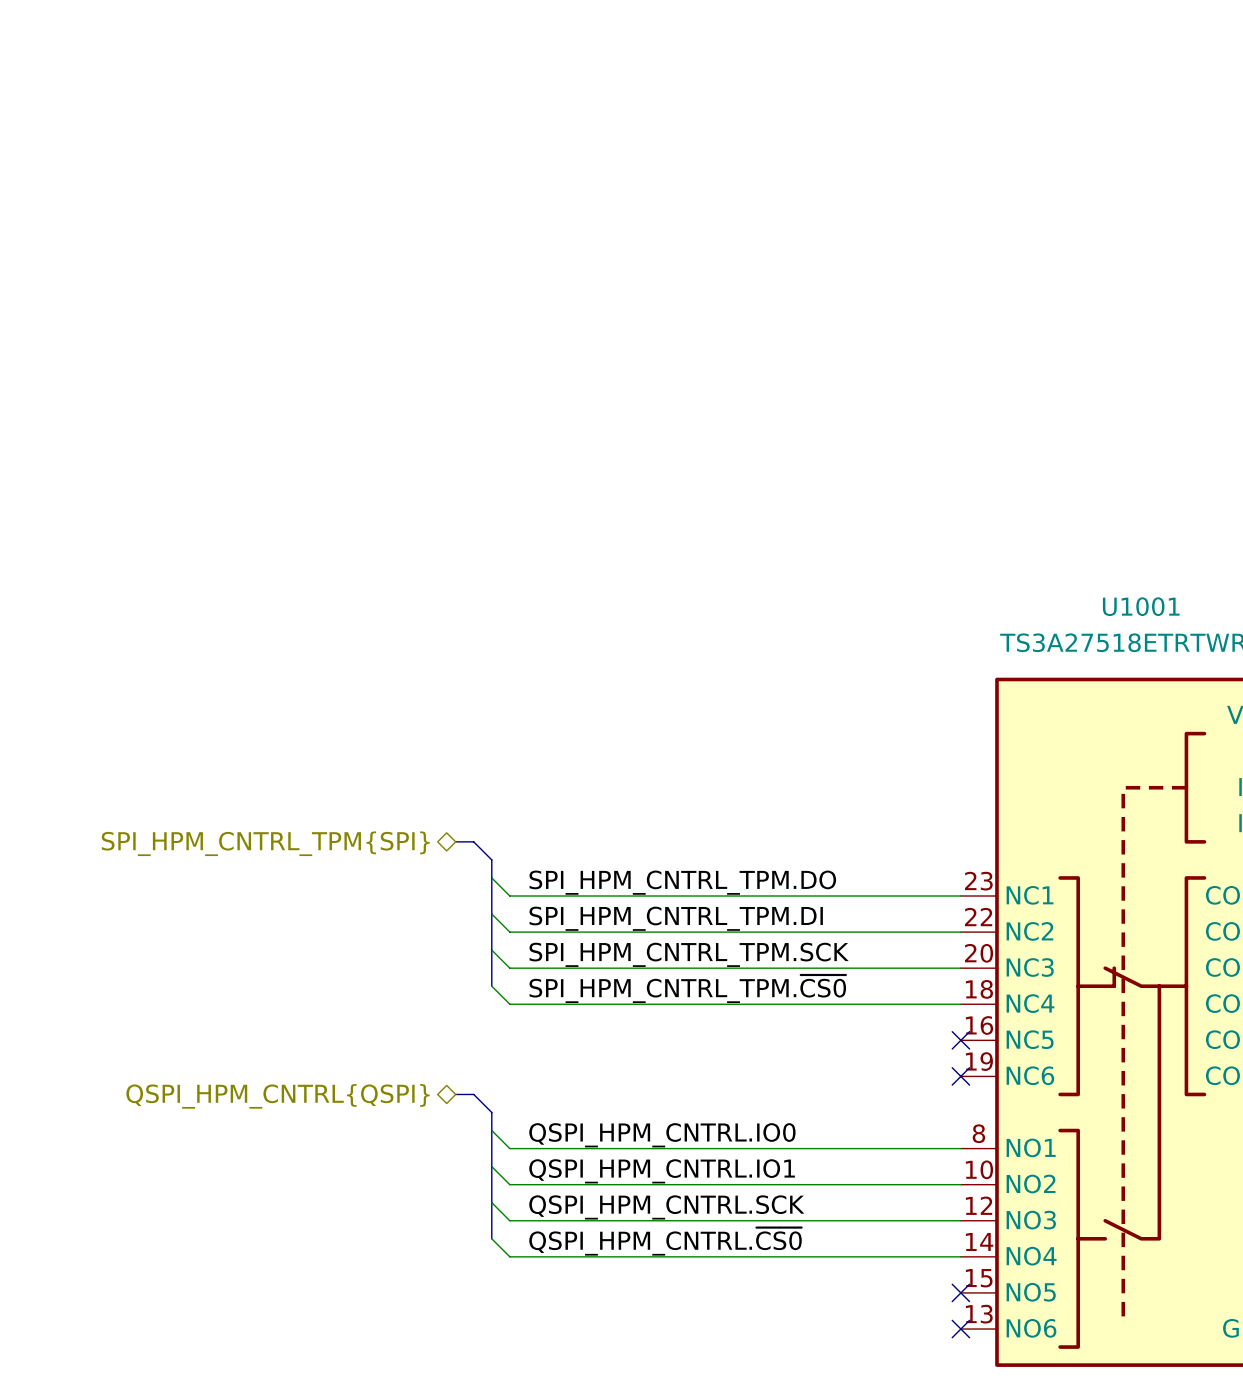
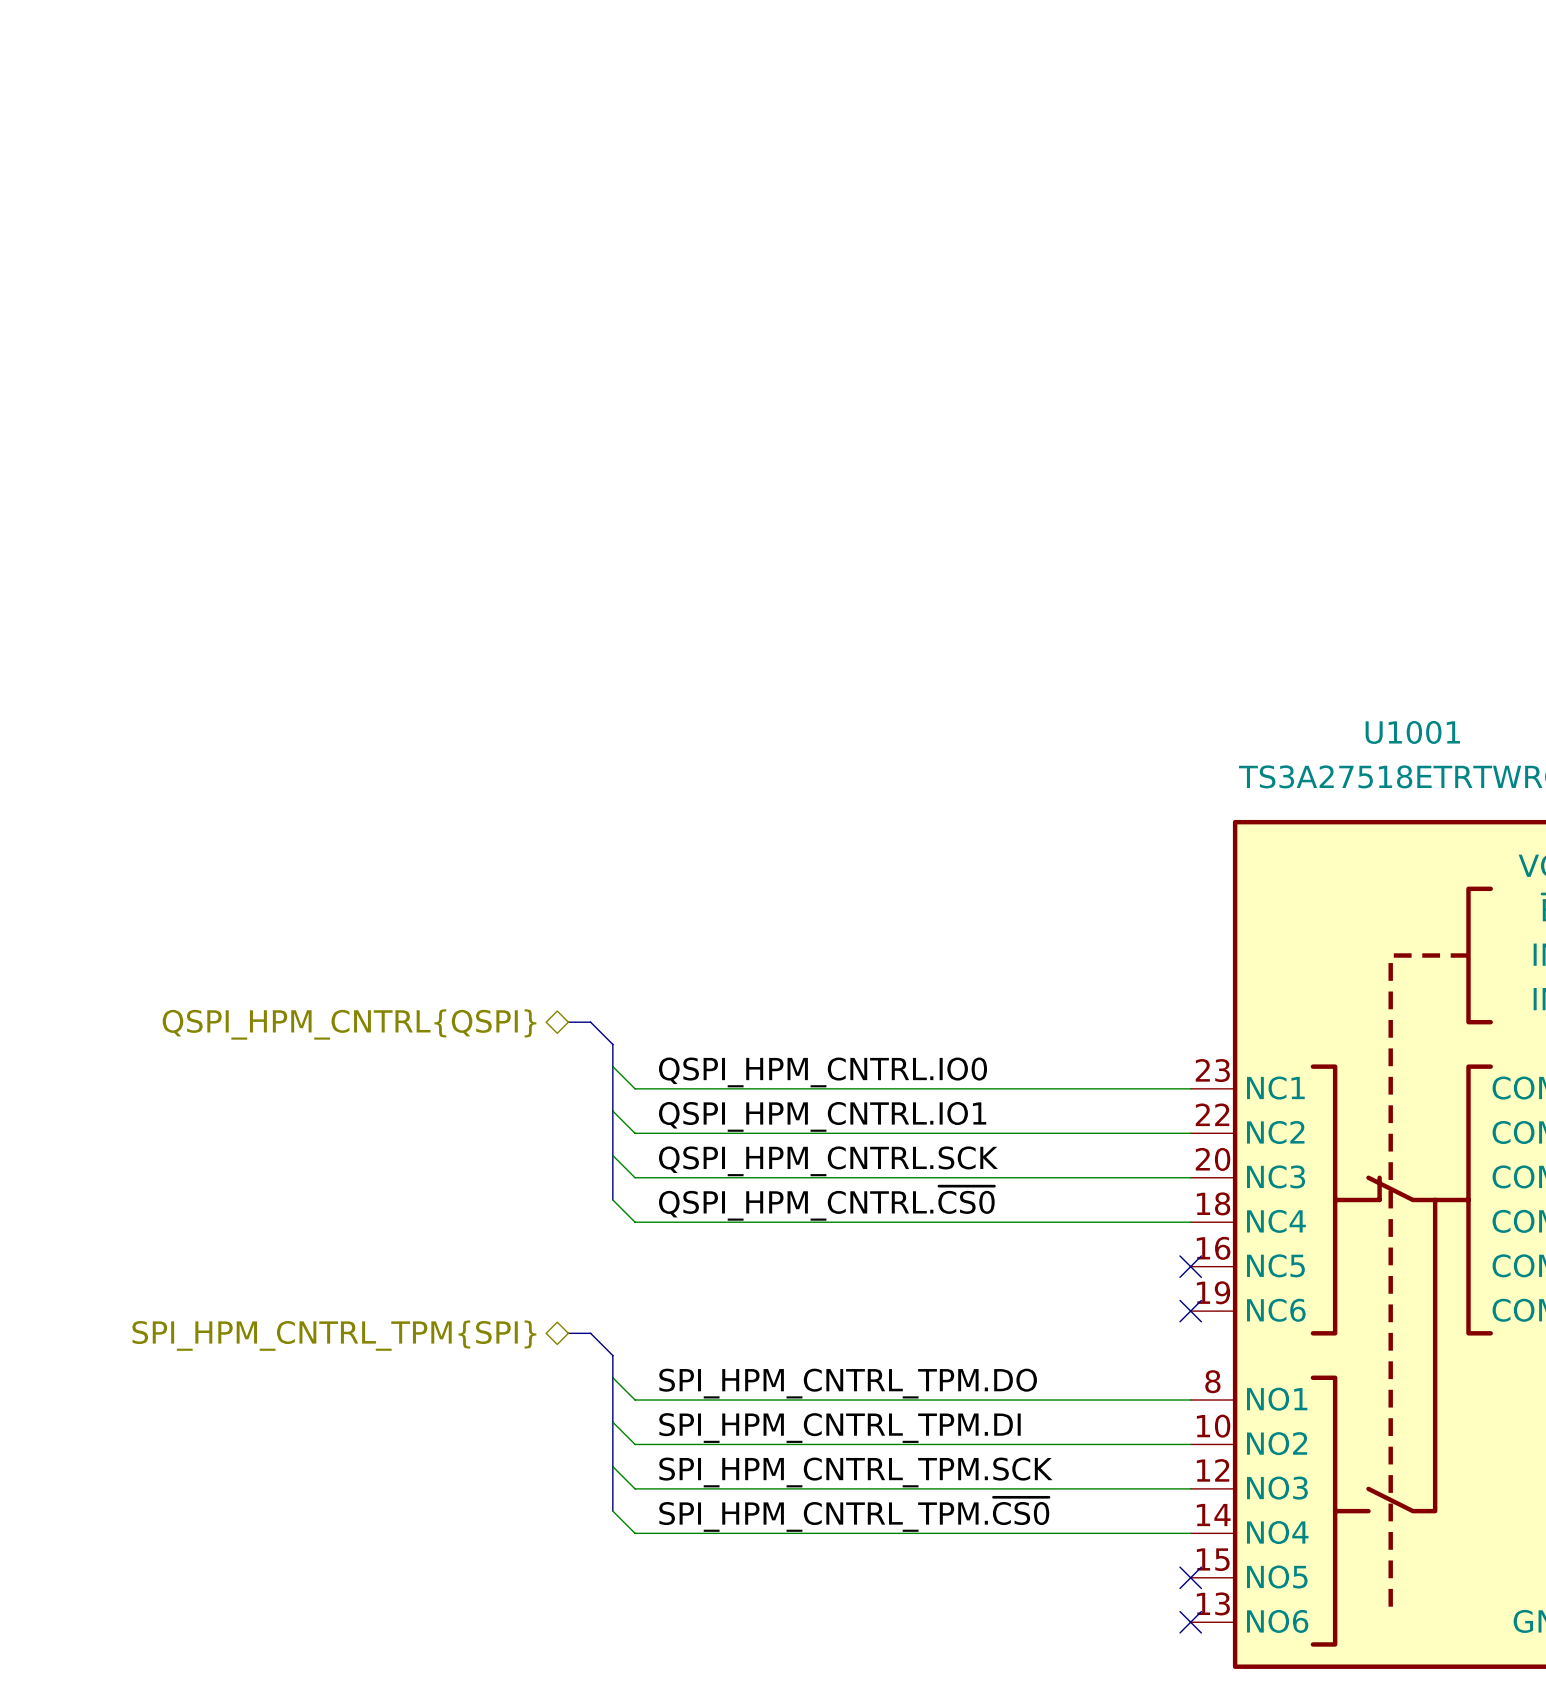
hierarchical label: SPI_HPM_CNTRL_TPM{SPI} (265, 843) -> QSPI_HPM_CNTRL{QSPI} (349, 1024)
label: SPI_HPM_CNTRL_TPM.DO (682, 882) -> QSPI_HPM_CNTRL.IO0 (823, 1072)
label: SPI_HPM_CNTRL_TPM.DI (676, 918) -> QSPI_HPM_CNTRL.IO1 (822, 1116)
label: SPI_HPM_CNTRL_TPM.SCK (689, 954) -> QSPI_HPM_CNTRL.SCK (828, 1161)
label: SPI_HPM_CNTRL_TPM.~{CS0} (687, 989) -> QSPI_HPM_CNTRL.~{CS0} (826, 1203)
hierarchical label: QSPI_HPM_CNTRL{QSPI} (278, 1096) -> SPI_HPM_CNTRL_TPM{SPI} (334, 1335)
label: QSPI_HPM_CNTRL.IO0 (662, 1135) -> SPI_HPM_CNTRL_TPM.DO (848, 1383)
label: QSPI_HPM_CNTRL.IO1 (662, 1171) -> SPI_HPM_CNTRL_TPM.DI (839, 1428)
label: QSPI_HPM_CNTRL.SCK (666, 1207) -> SPI_HPM_CNTRL_TPM.SCK (855, 1472)
label: QSPI_HPM_CNTRL.~{CS0} (665, 1241) -> SPI_HPM_CNTRL_TPM.~{CS0} (854, 1514)

